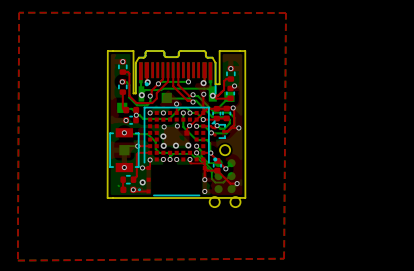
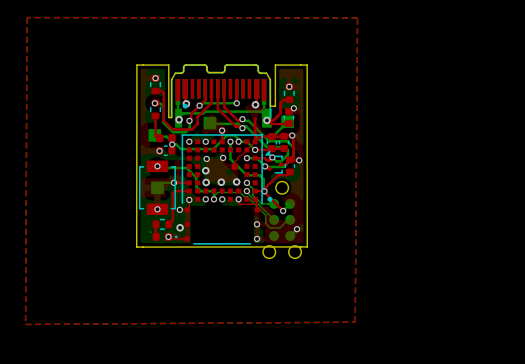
via: (203, 94) -> none
via: (189, 125) -> none
top track: none -> (289, 171) (286, 175) (278, 175) (264, 188) (264, 191)
part position: (217, 165) -> (289, 165)
top track: (204, 179) (204, 167) (207, 170) (217, 170) (230, 183) (237, 183) -> none

